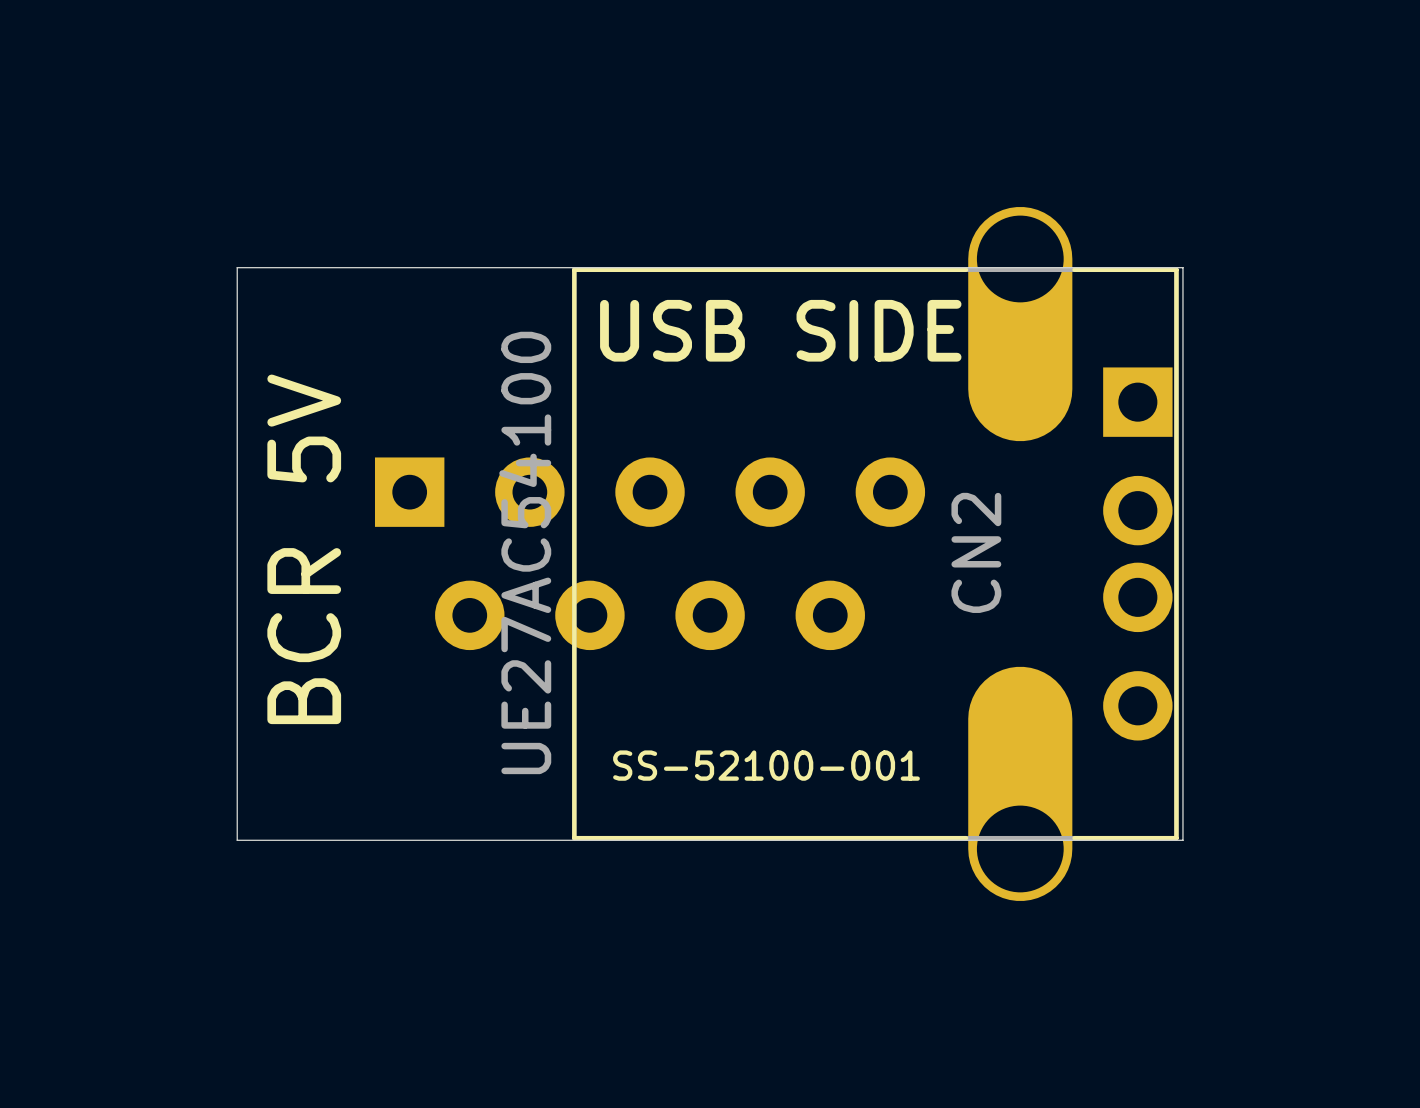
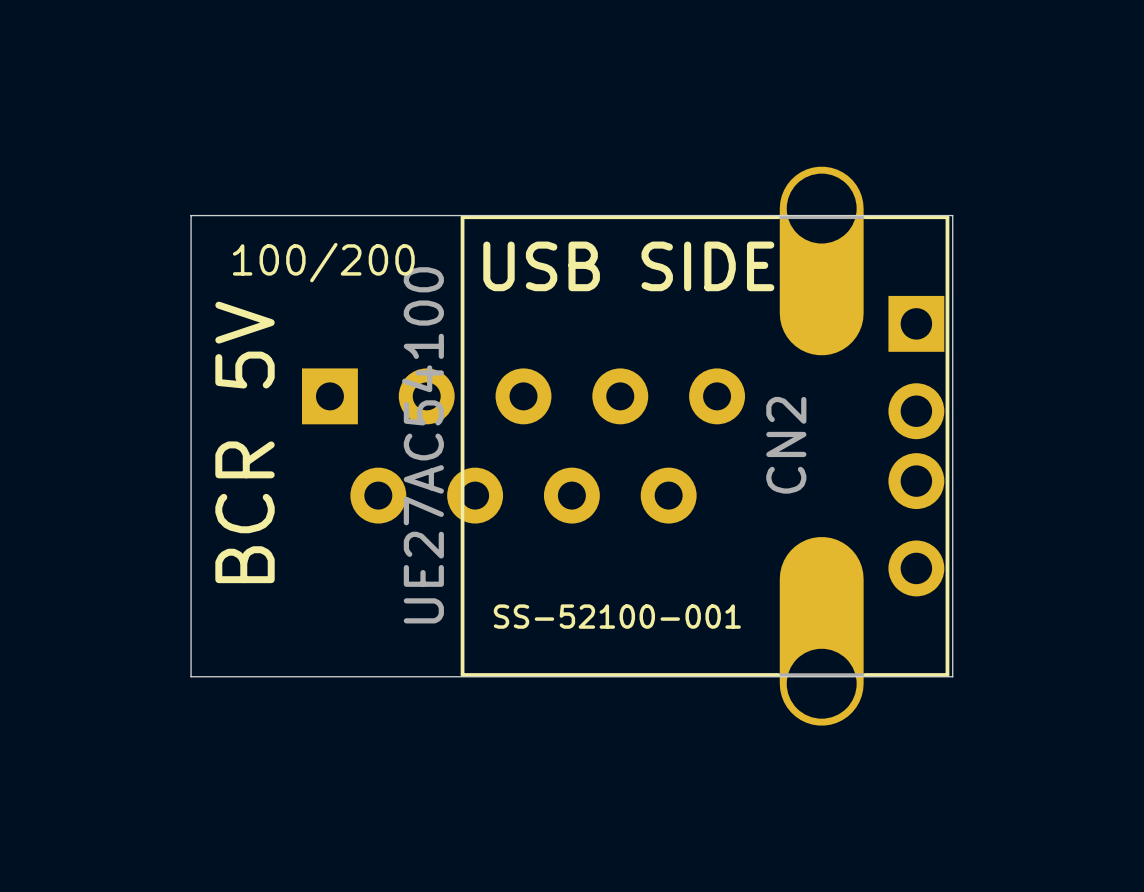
text: none -> 100/200 (323, 262)

